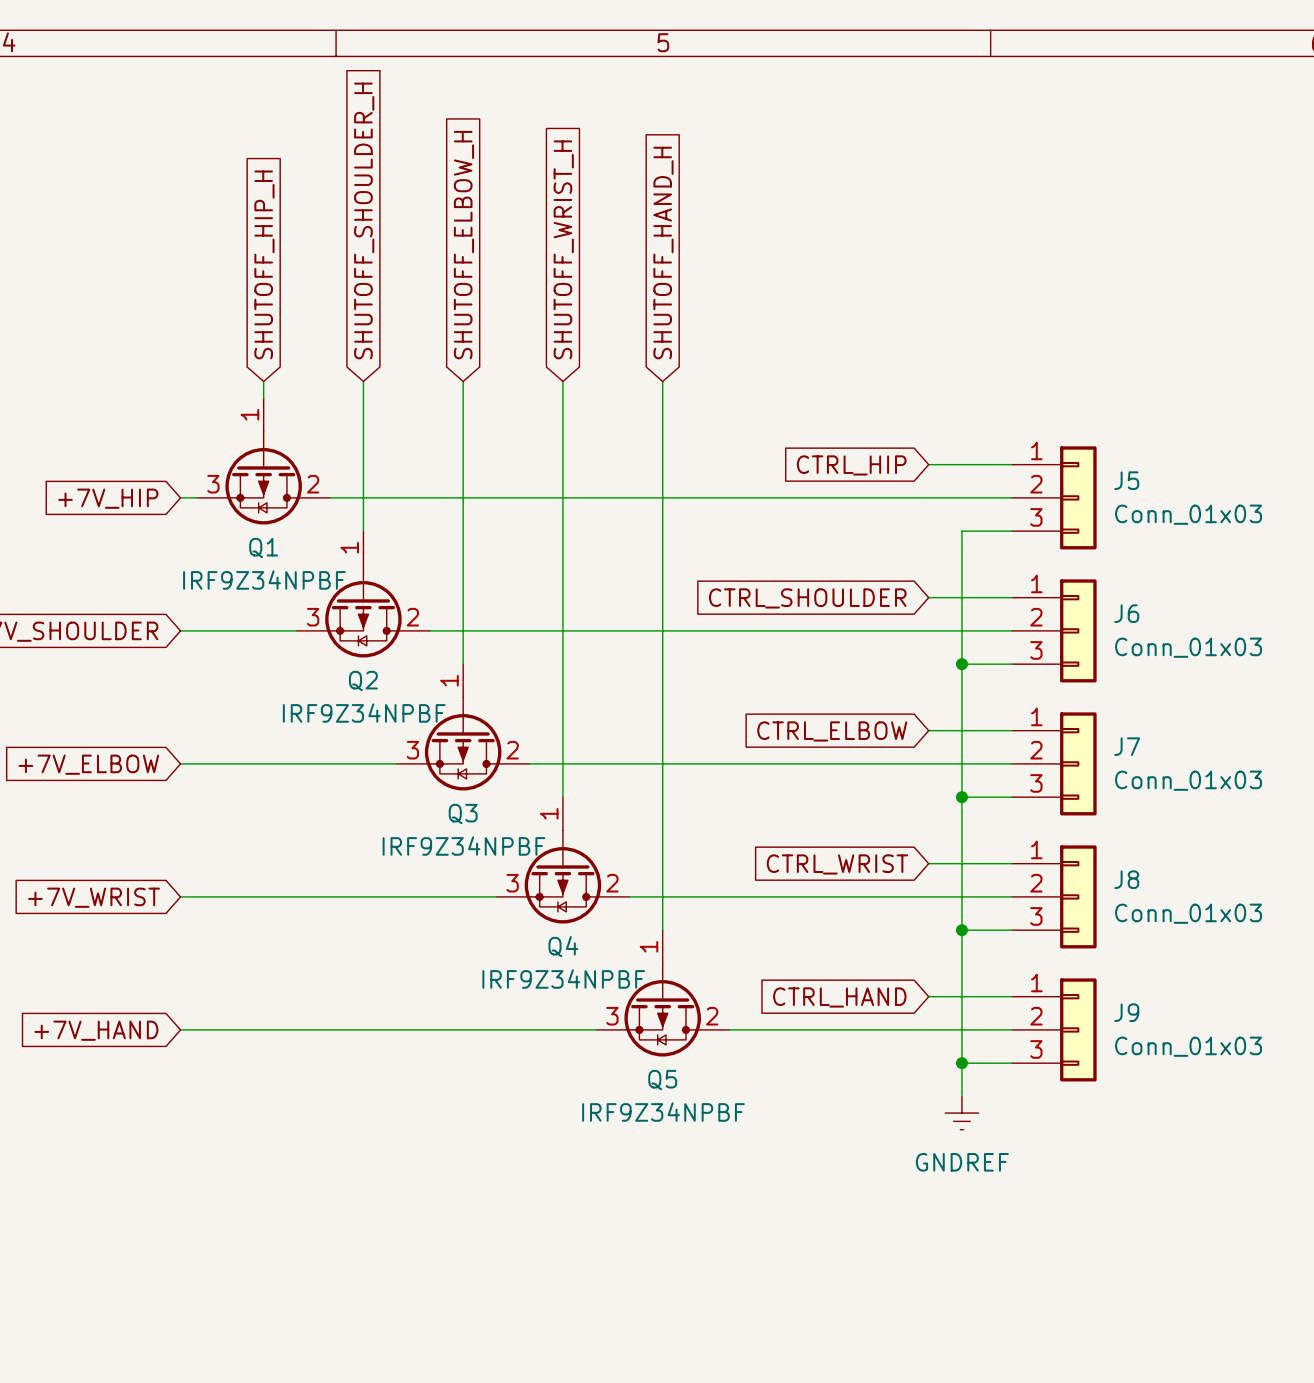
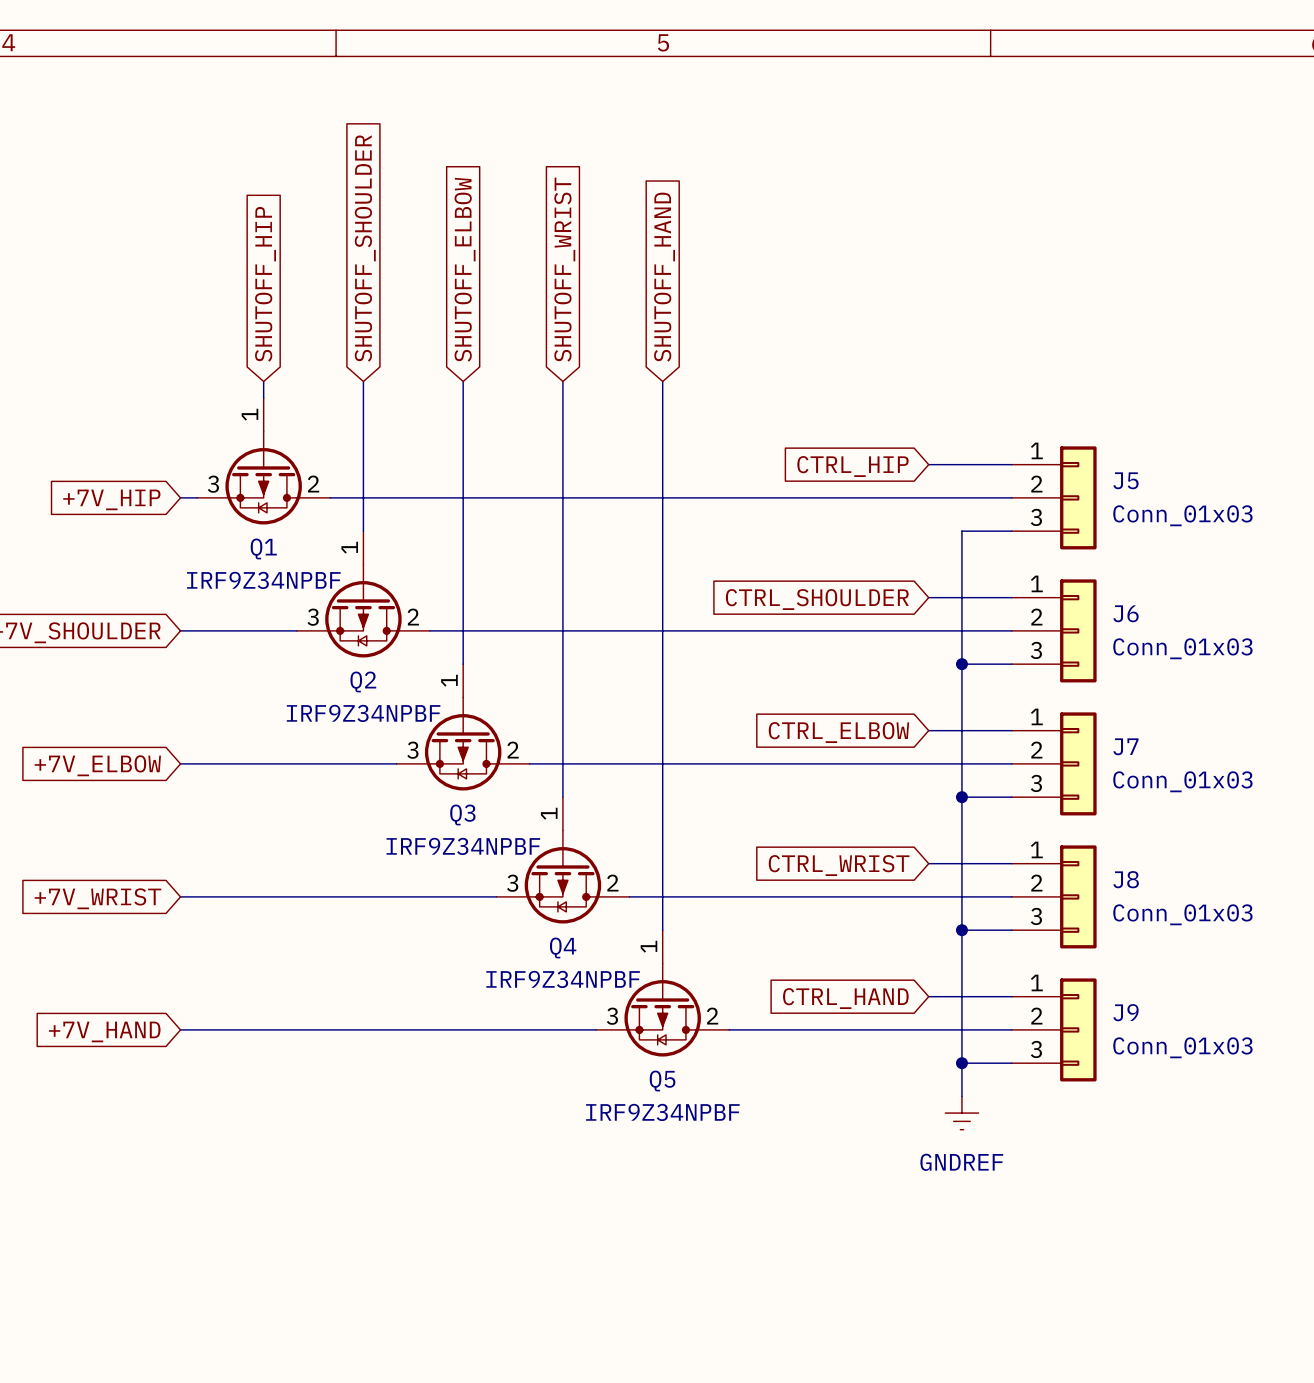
global label: SHUTOFF_SHOULDER_H (364, 220) -> SHUTOFF_SHOULDER (365, 248)
global label: SHUTOFF_ELBOW_H (463, 245) -> SHUTOFF_ELBOW (465, 269)
global label: SHUTOFF_WRIST_H (563, 249) -> SHUTOFF_WRIST (564, 269)
global label: SHUTOFF_HAND_H (663, 253) -> SHUTOFF_HAND (664, 277)
global label: SHUTOFF_HIP_H (264, 264) -> SHUTOFF_HIP (265, 284)

